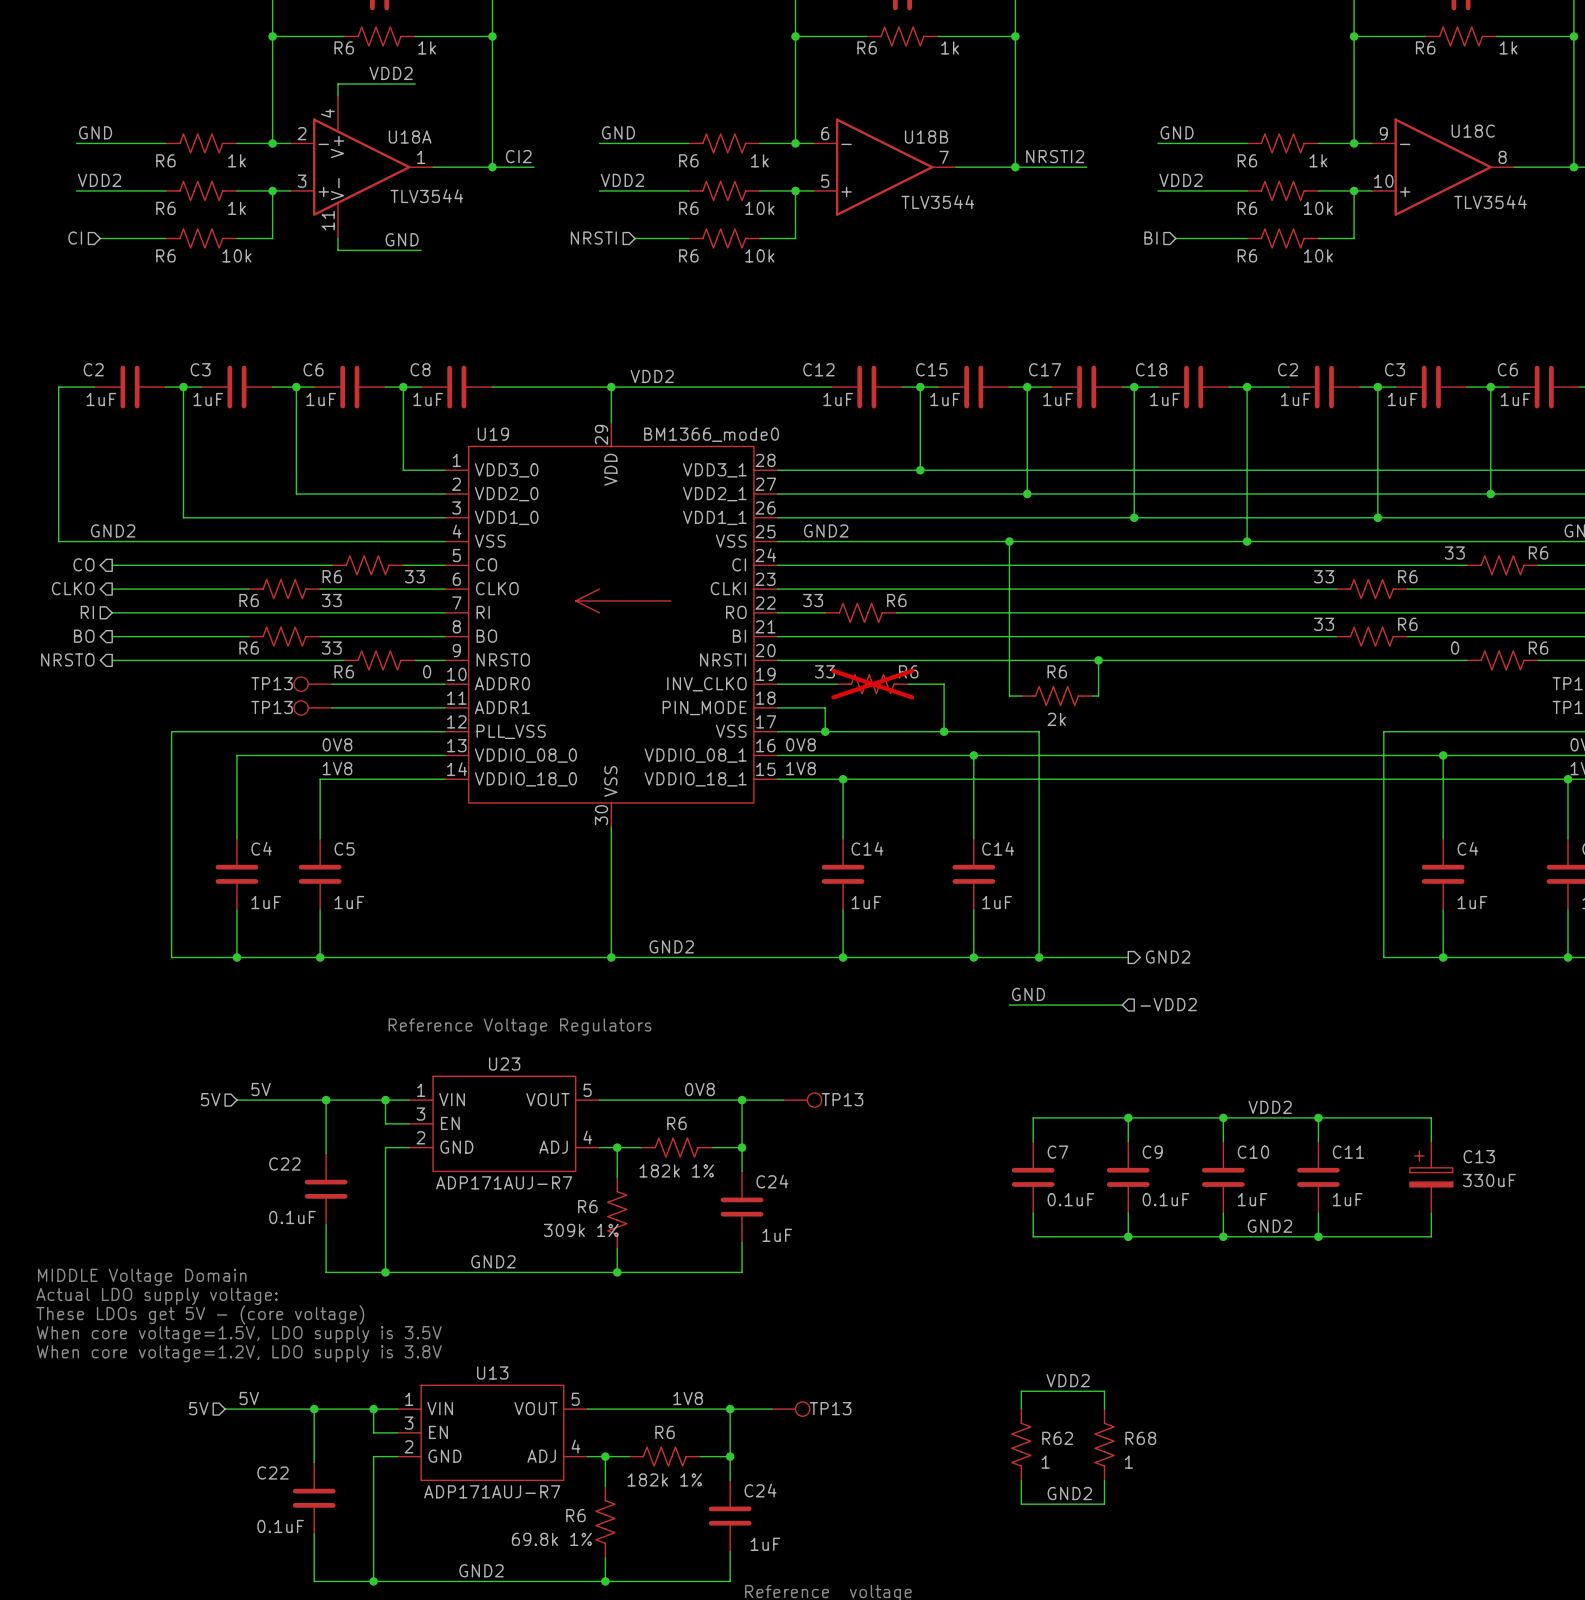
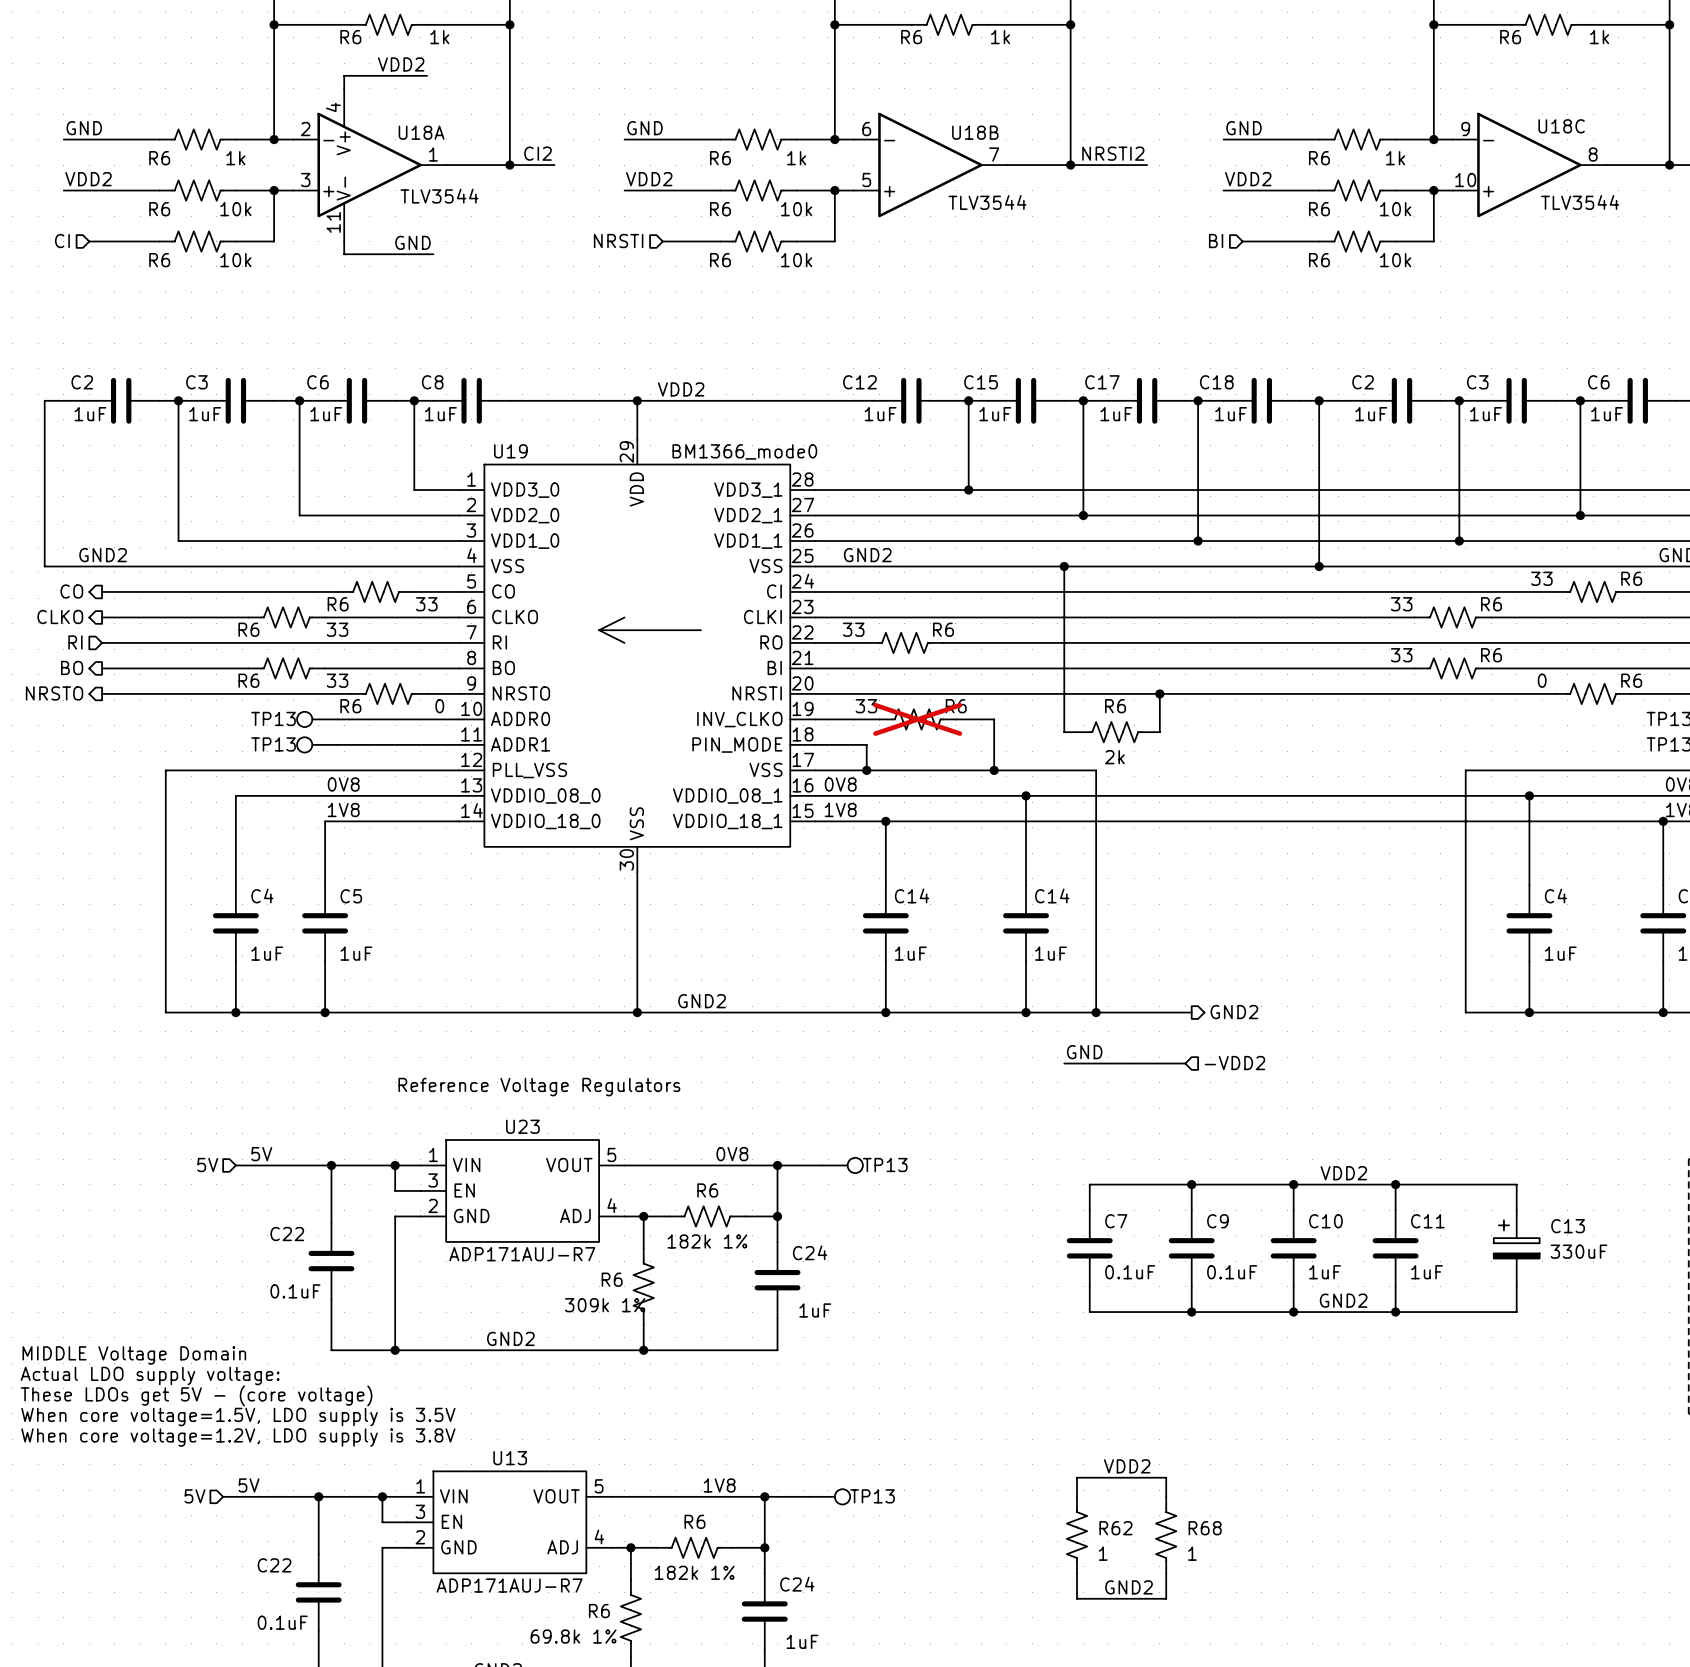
R6 value: 1k (236, 208) -> 10k (235, 209)

